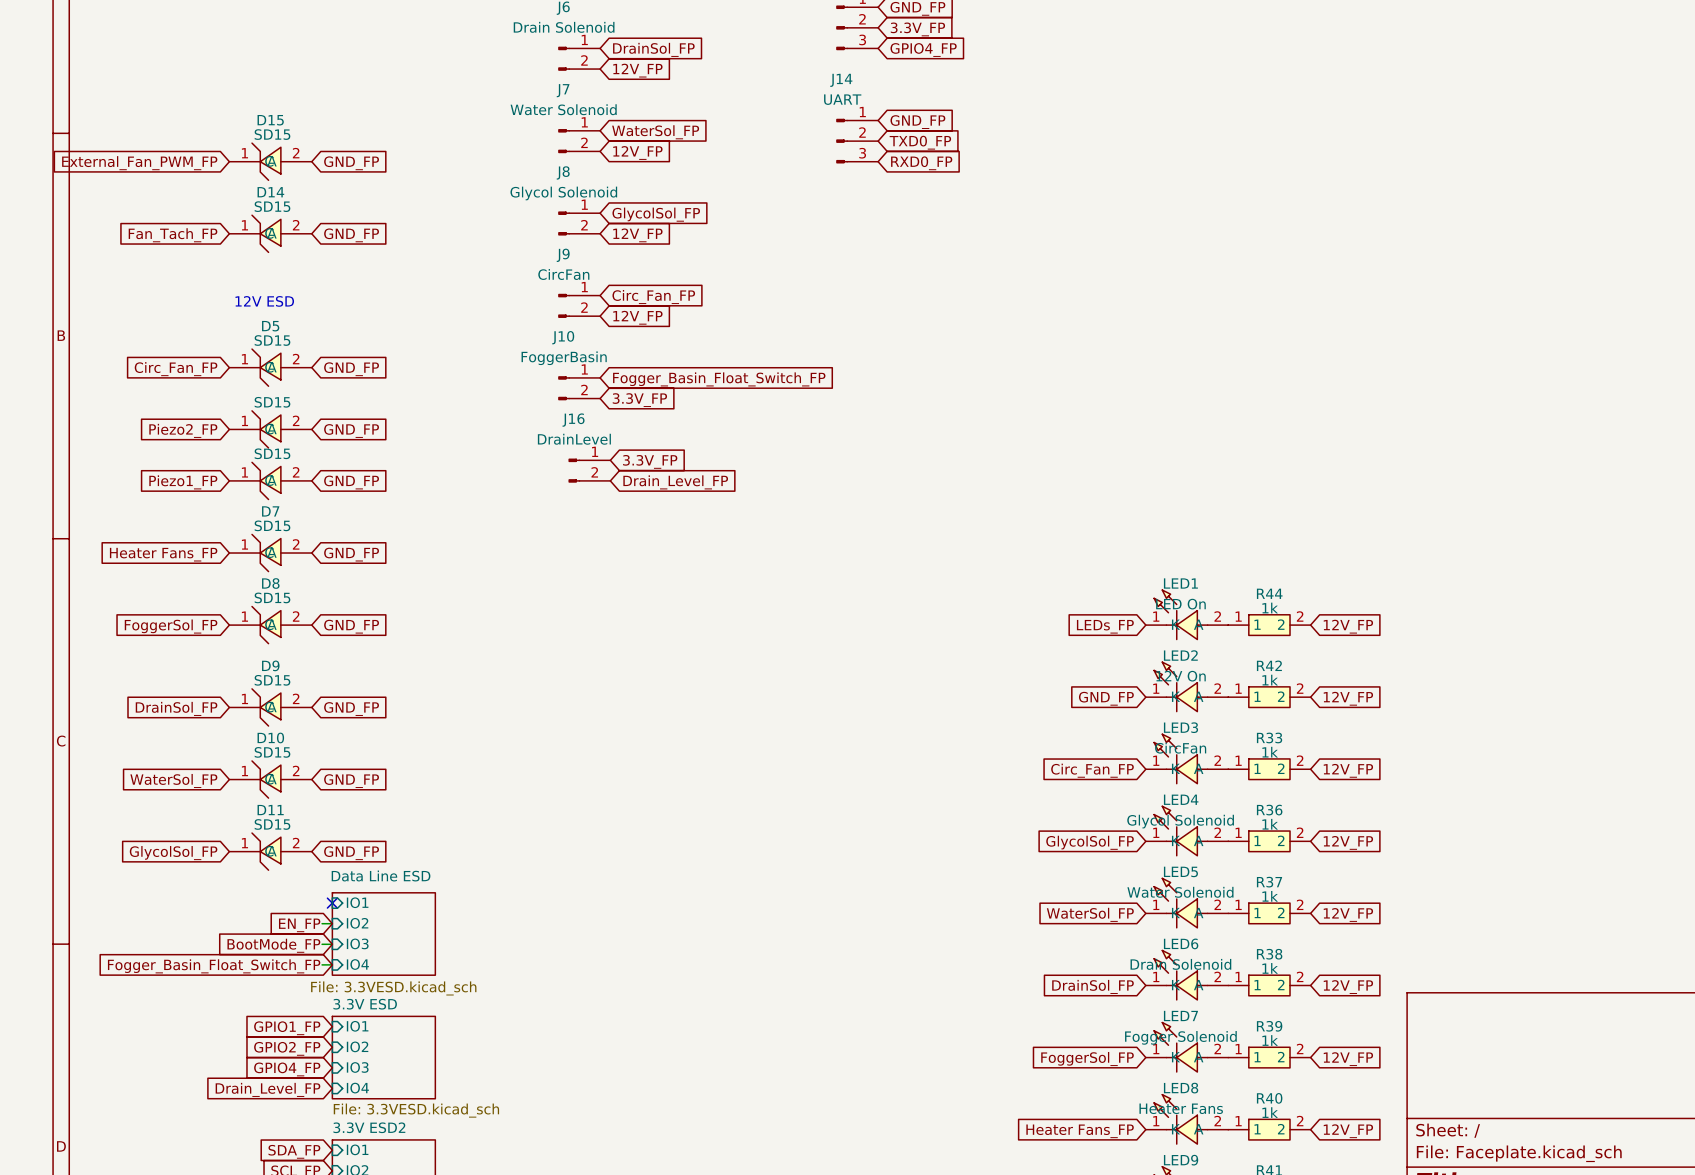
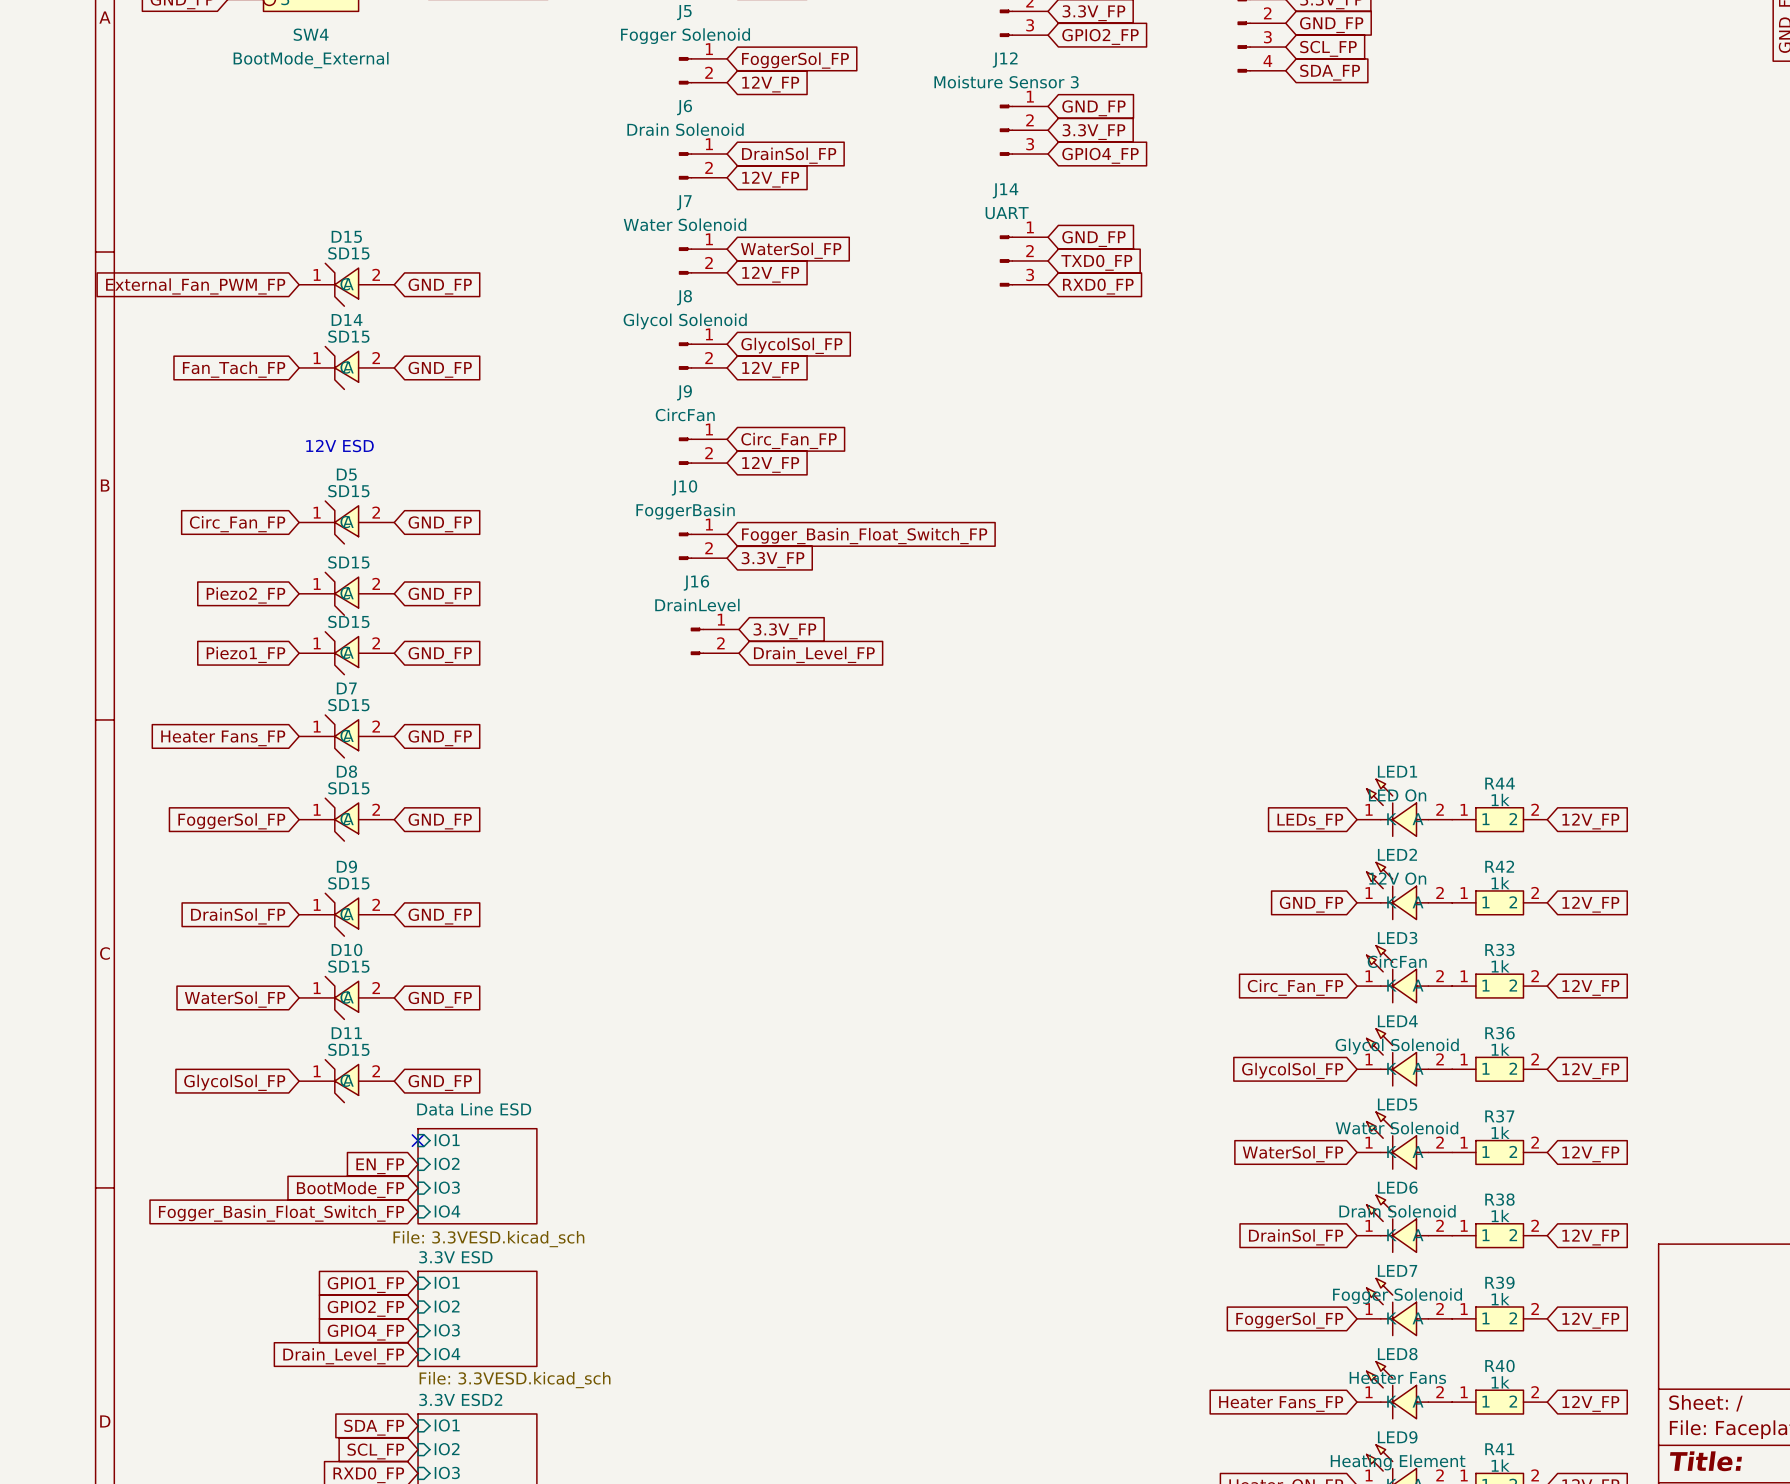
wire: (322, 923) (332, 923) -> none
wire: (322, 944) (332, 944) -> none
wire: (322, 964) (332, 964) -> none

